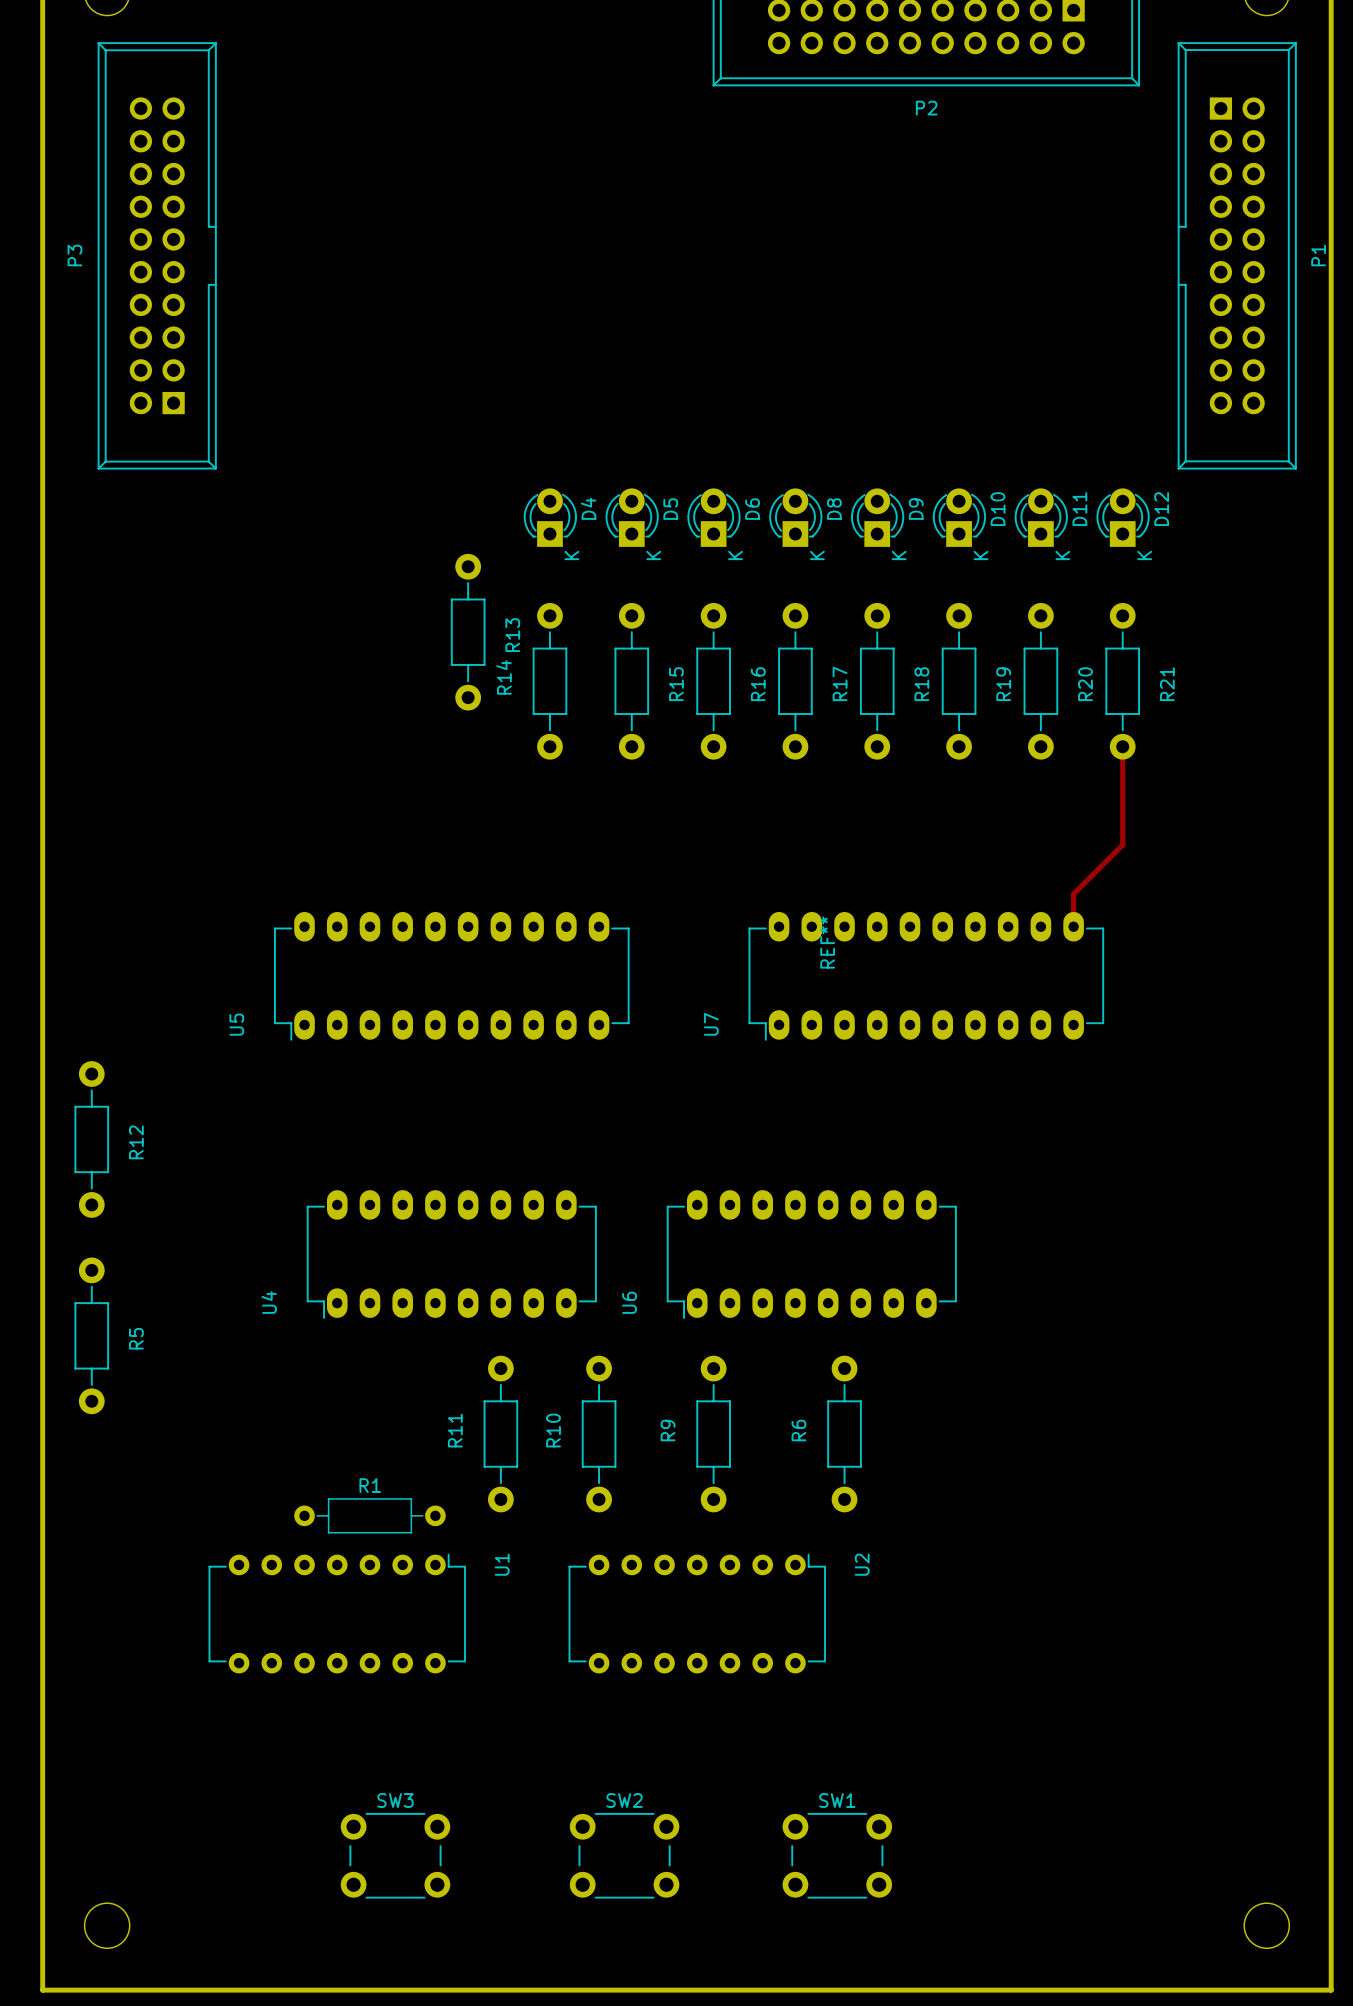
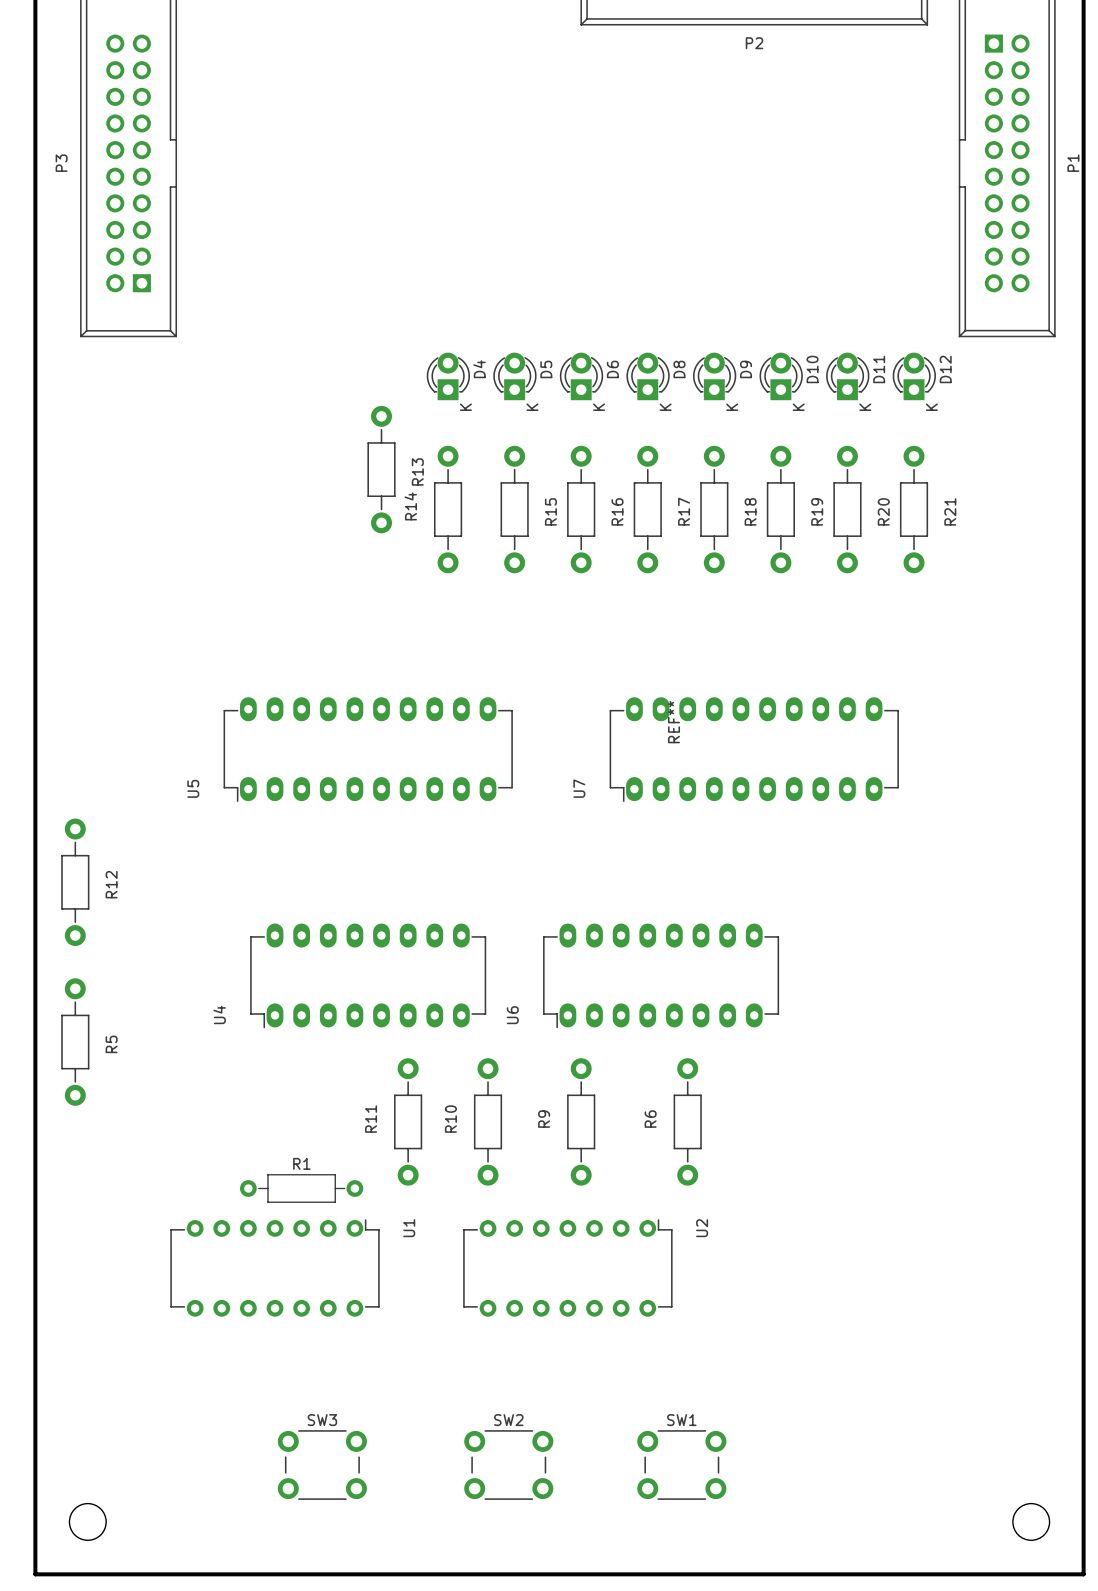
track: (1122, 746) (1122, 844) (1073, 894) (1073, 926) -> none

